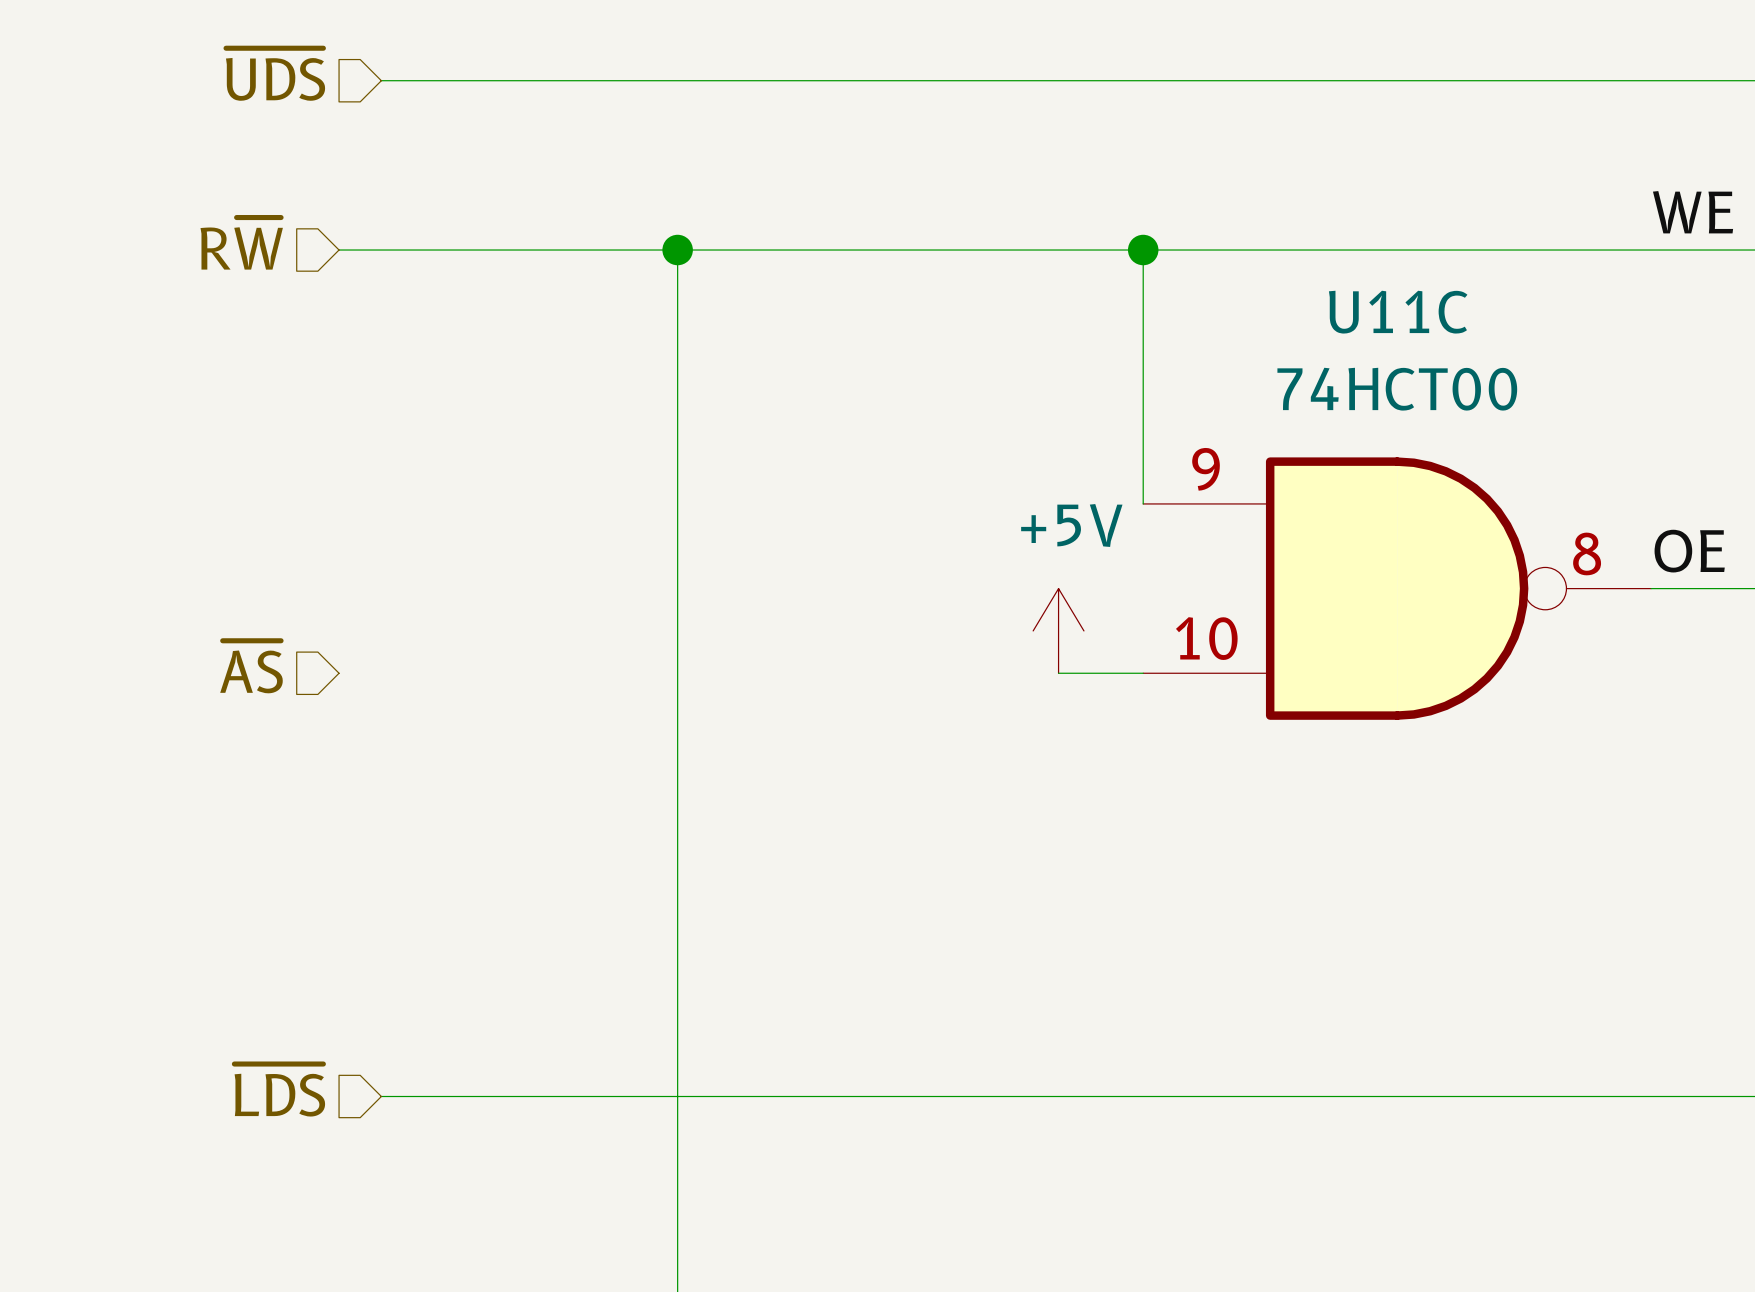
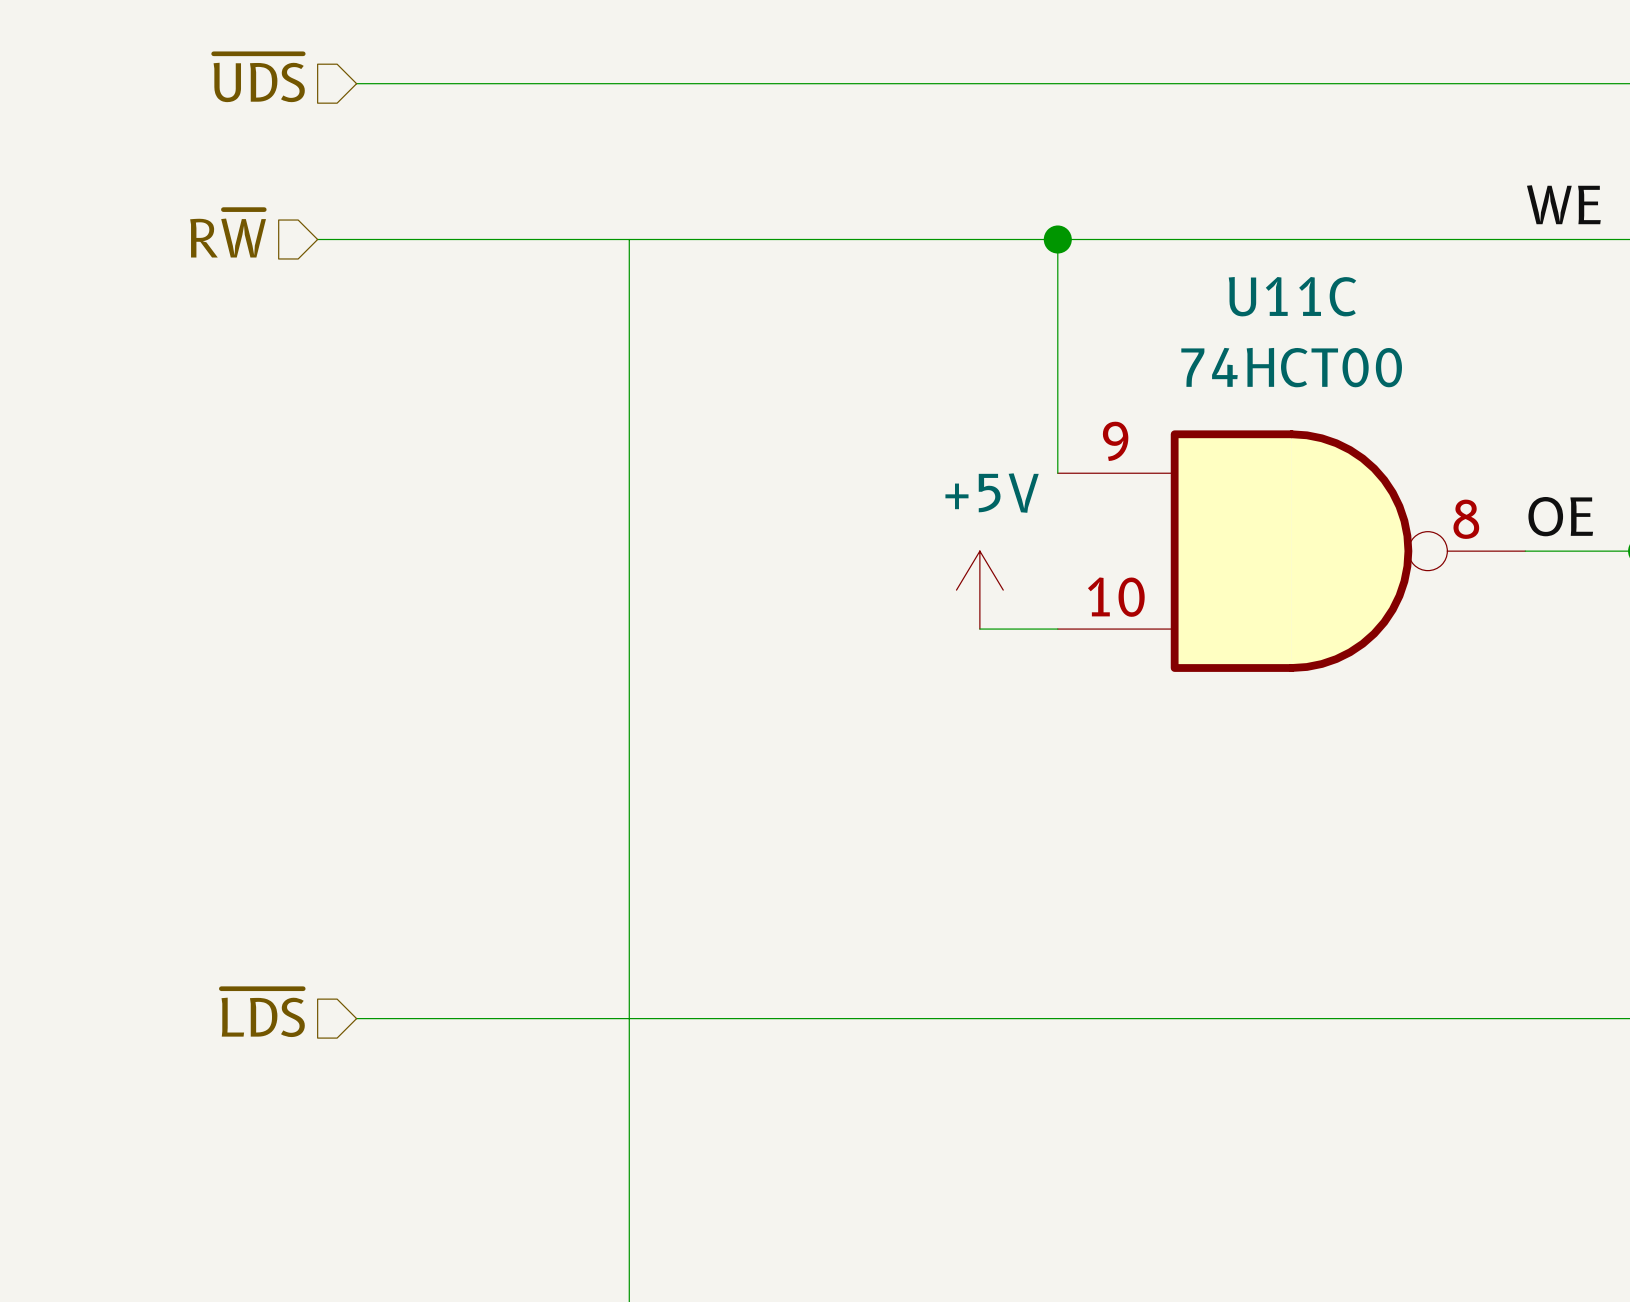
junction: (677, 250) -> none
hierarchical label: ~{AS} (251, 667) -> none

